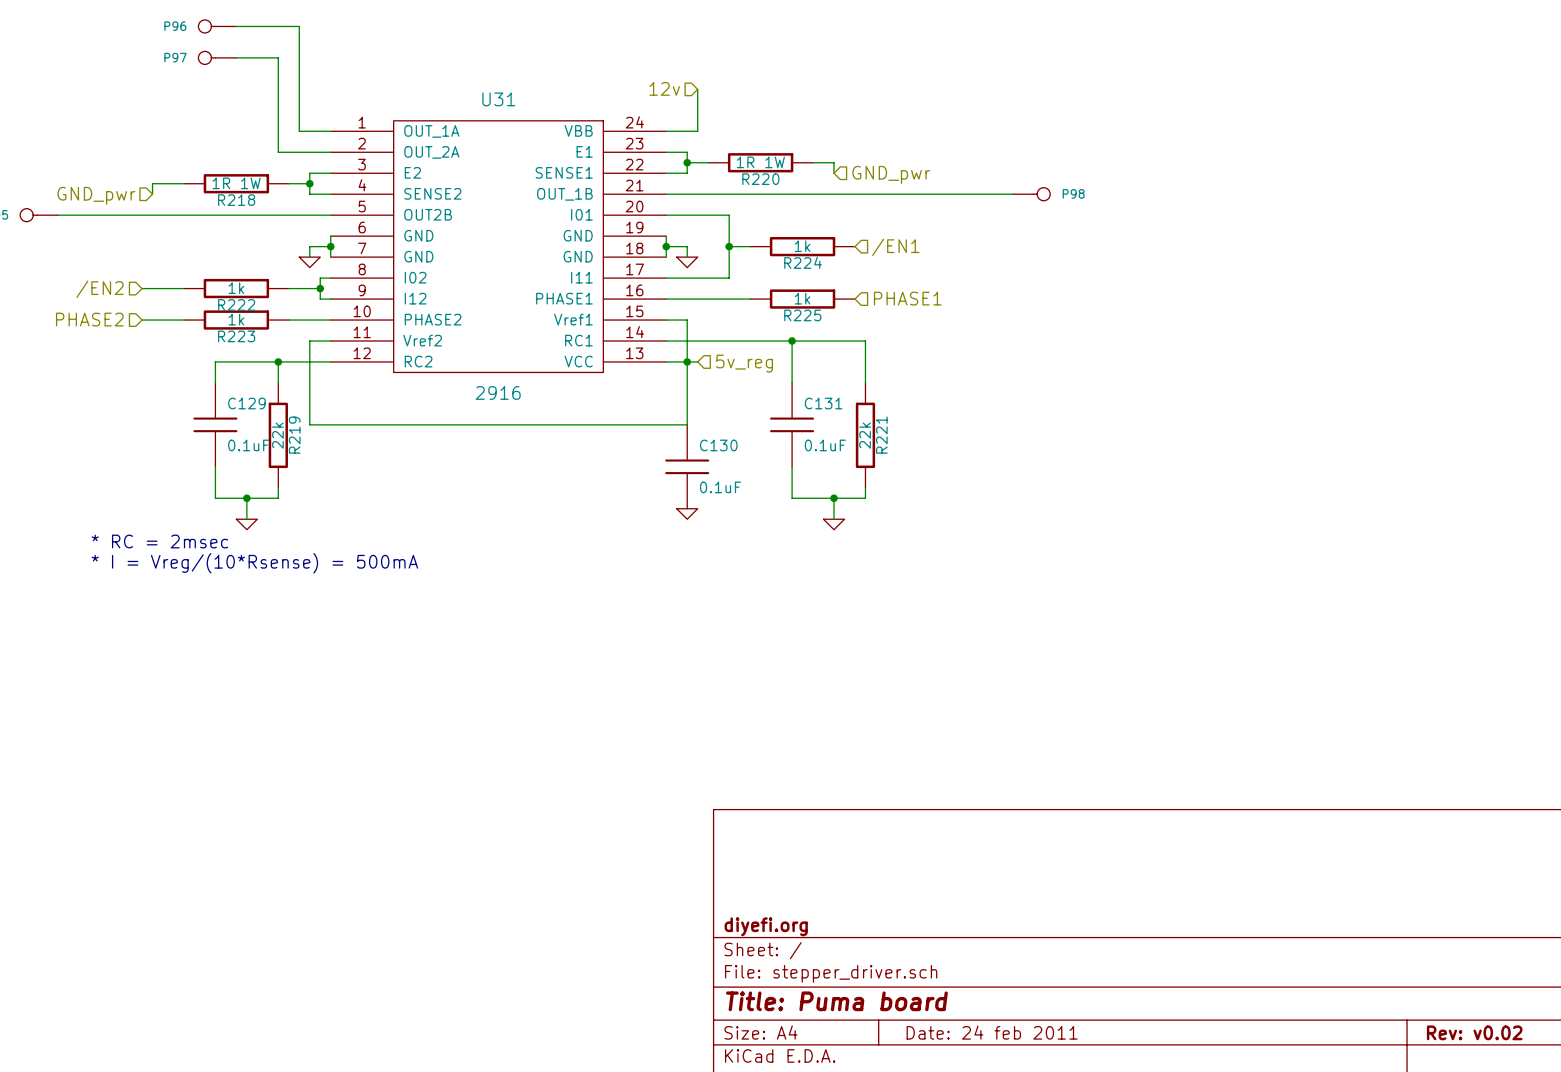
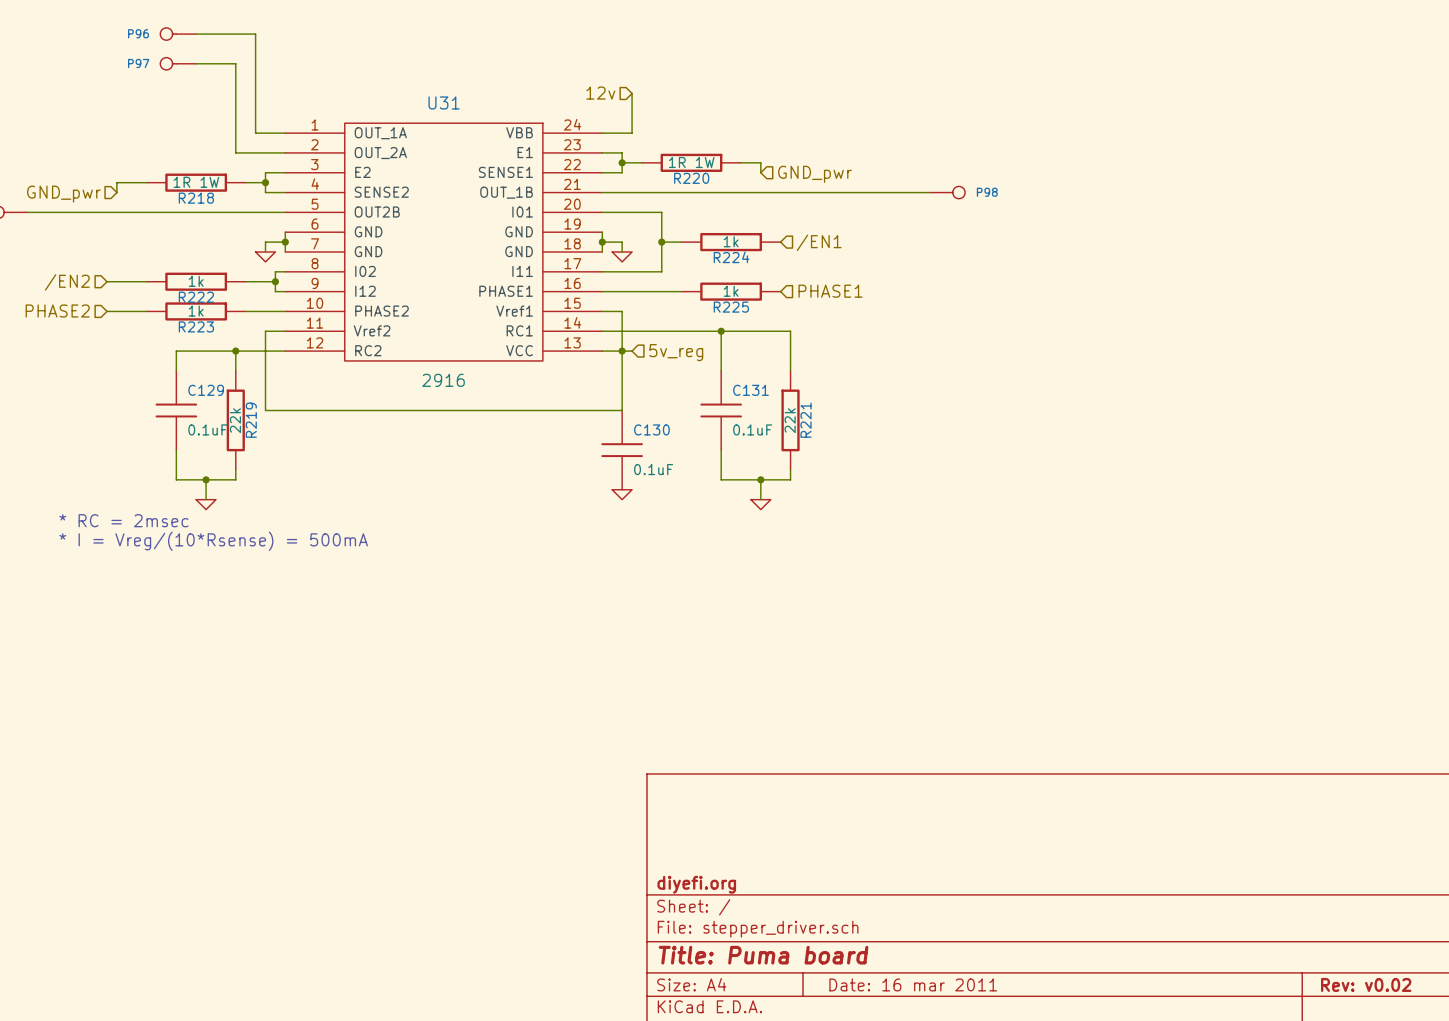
title block: Date: 24 feb 2011 (992, 1032) -> Date: 16 mar 2011 (913, 984)

